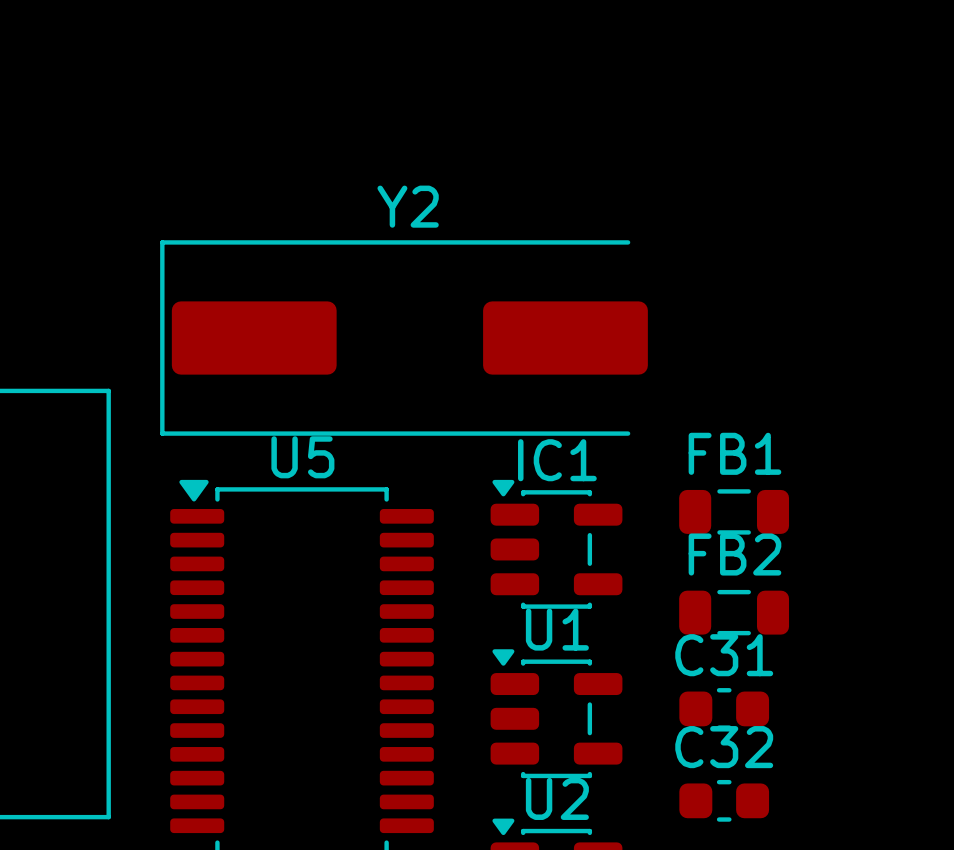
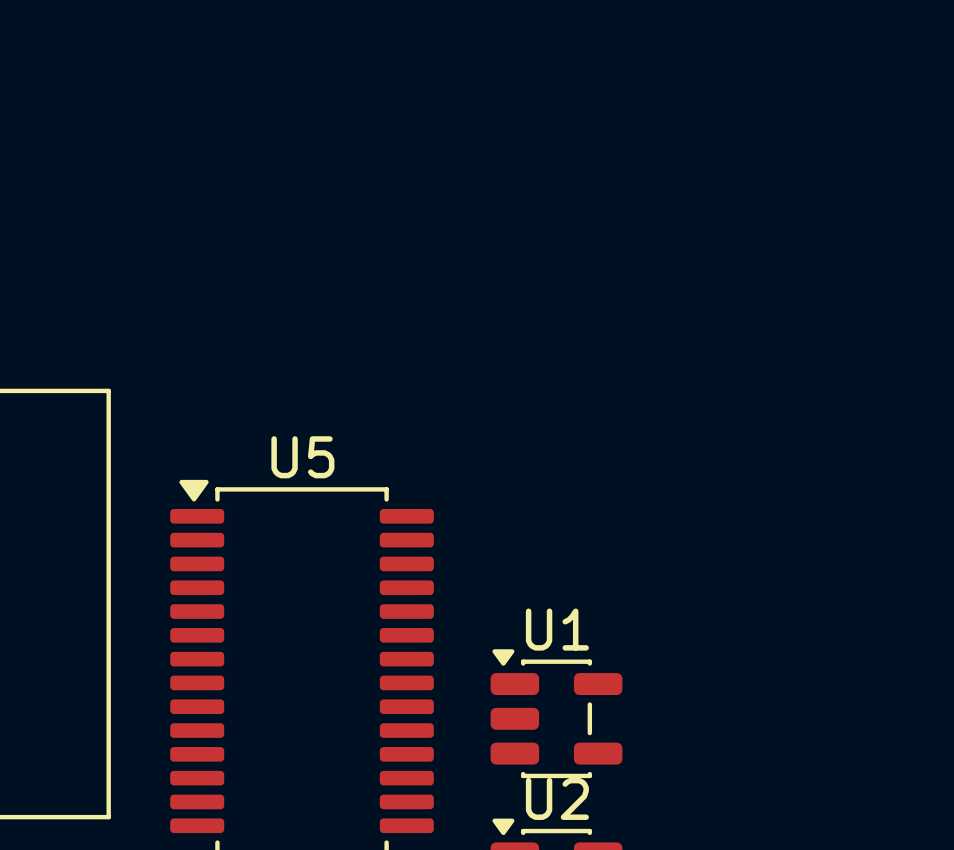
Y2: (404, 338) -> none
FB1: (734, 511) -> none
IC1: (556, 544) -> none
FB2: (734, 612) -> none
C31: (724, 708) -> none
C32: (724, 800) -> none

